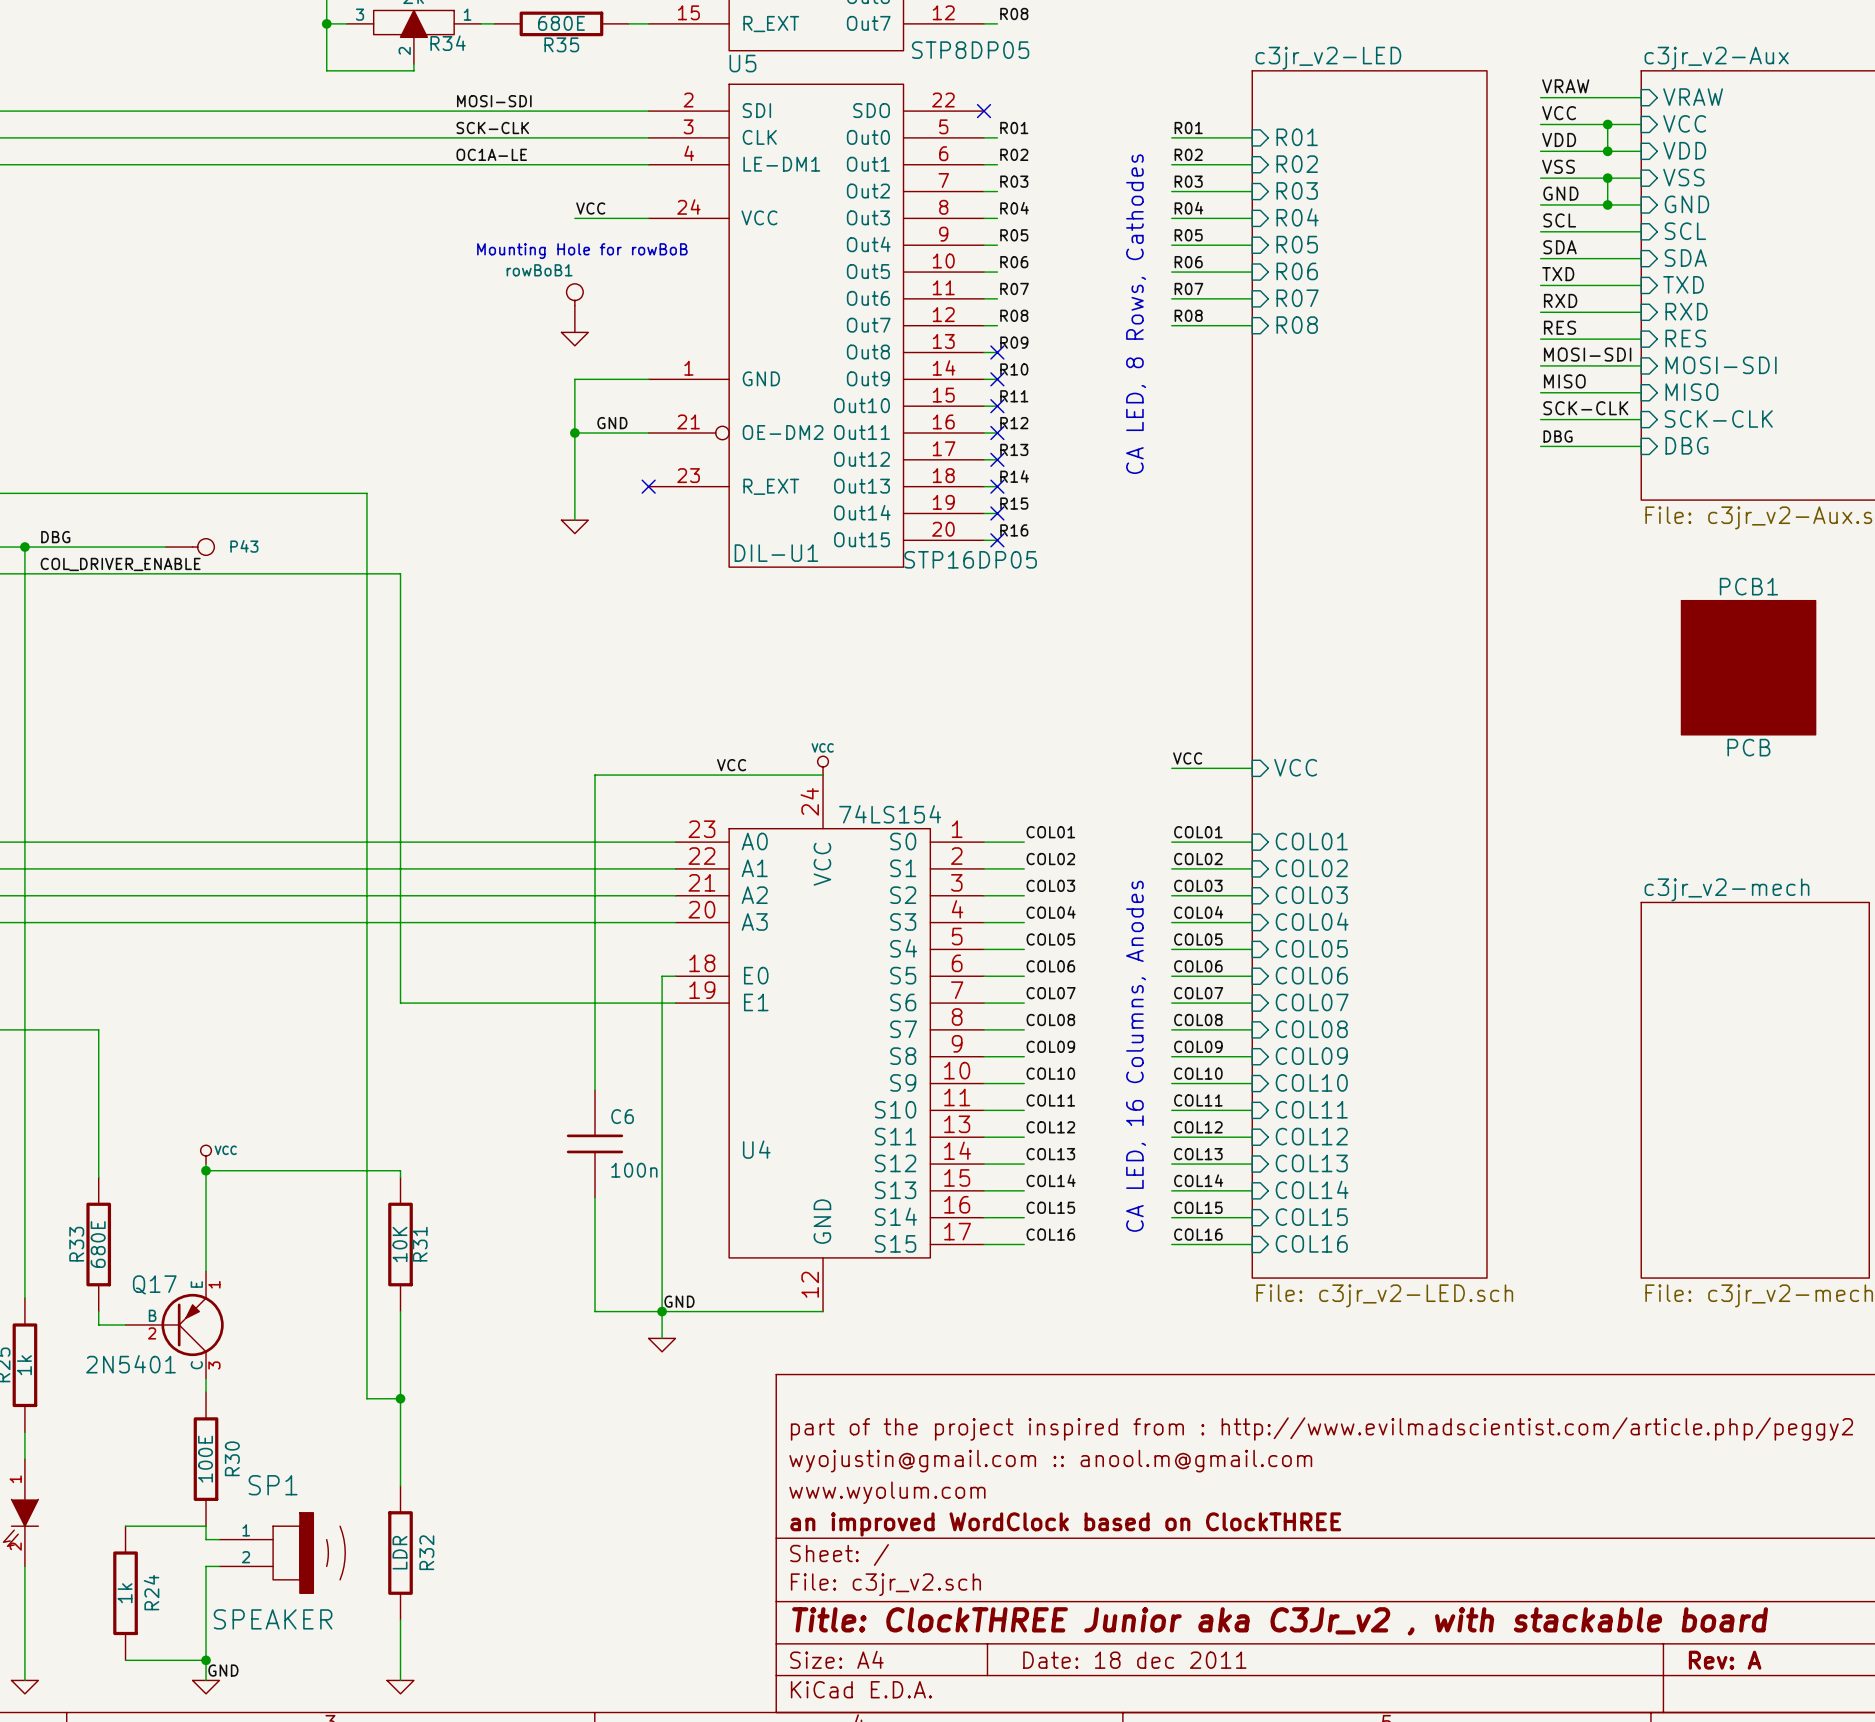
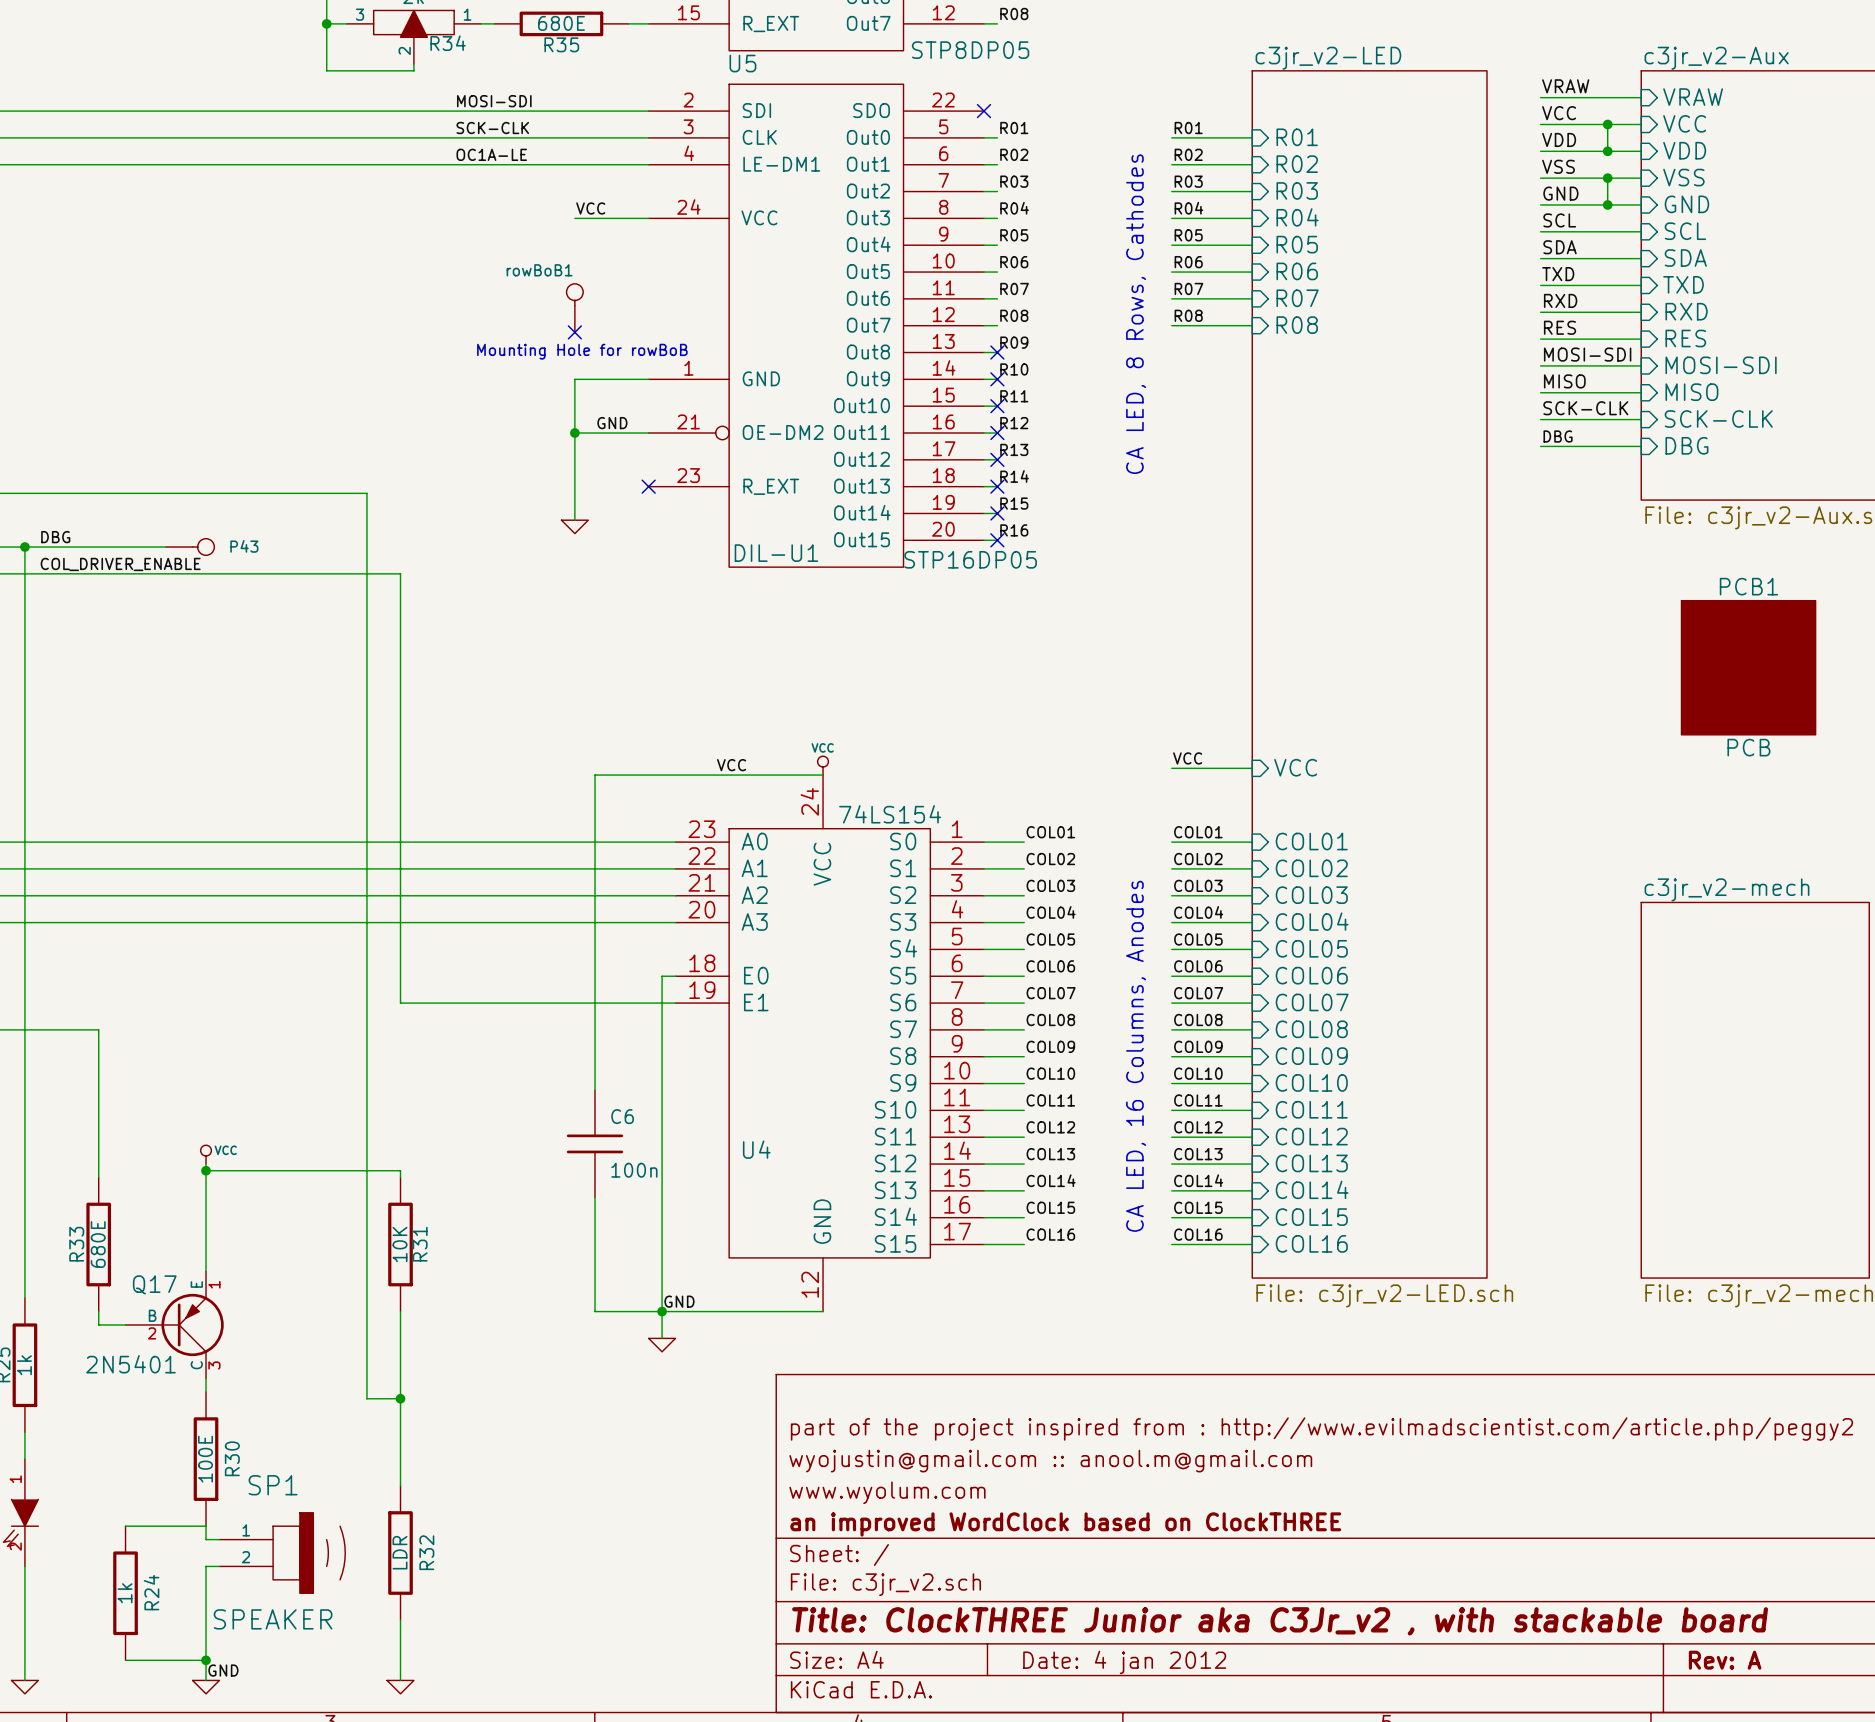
text position: Mounting Hole for rowBoB (582, 251) -> Mounting Hole for rowBoB (582, 351)
no-connect mark: none -> (574, 332)
power symbol: (574, 339) -> none
title block: Date: 18 dec 2011 (1134, 1660) -> Date: 4 jan 2012 (1124, 1662)

